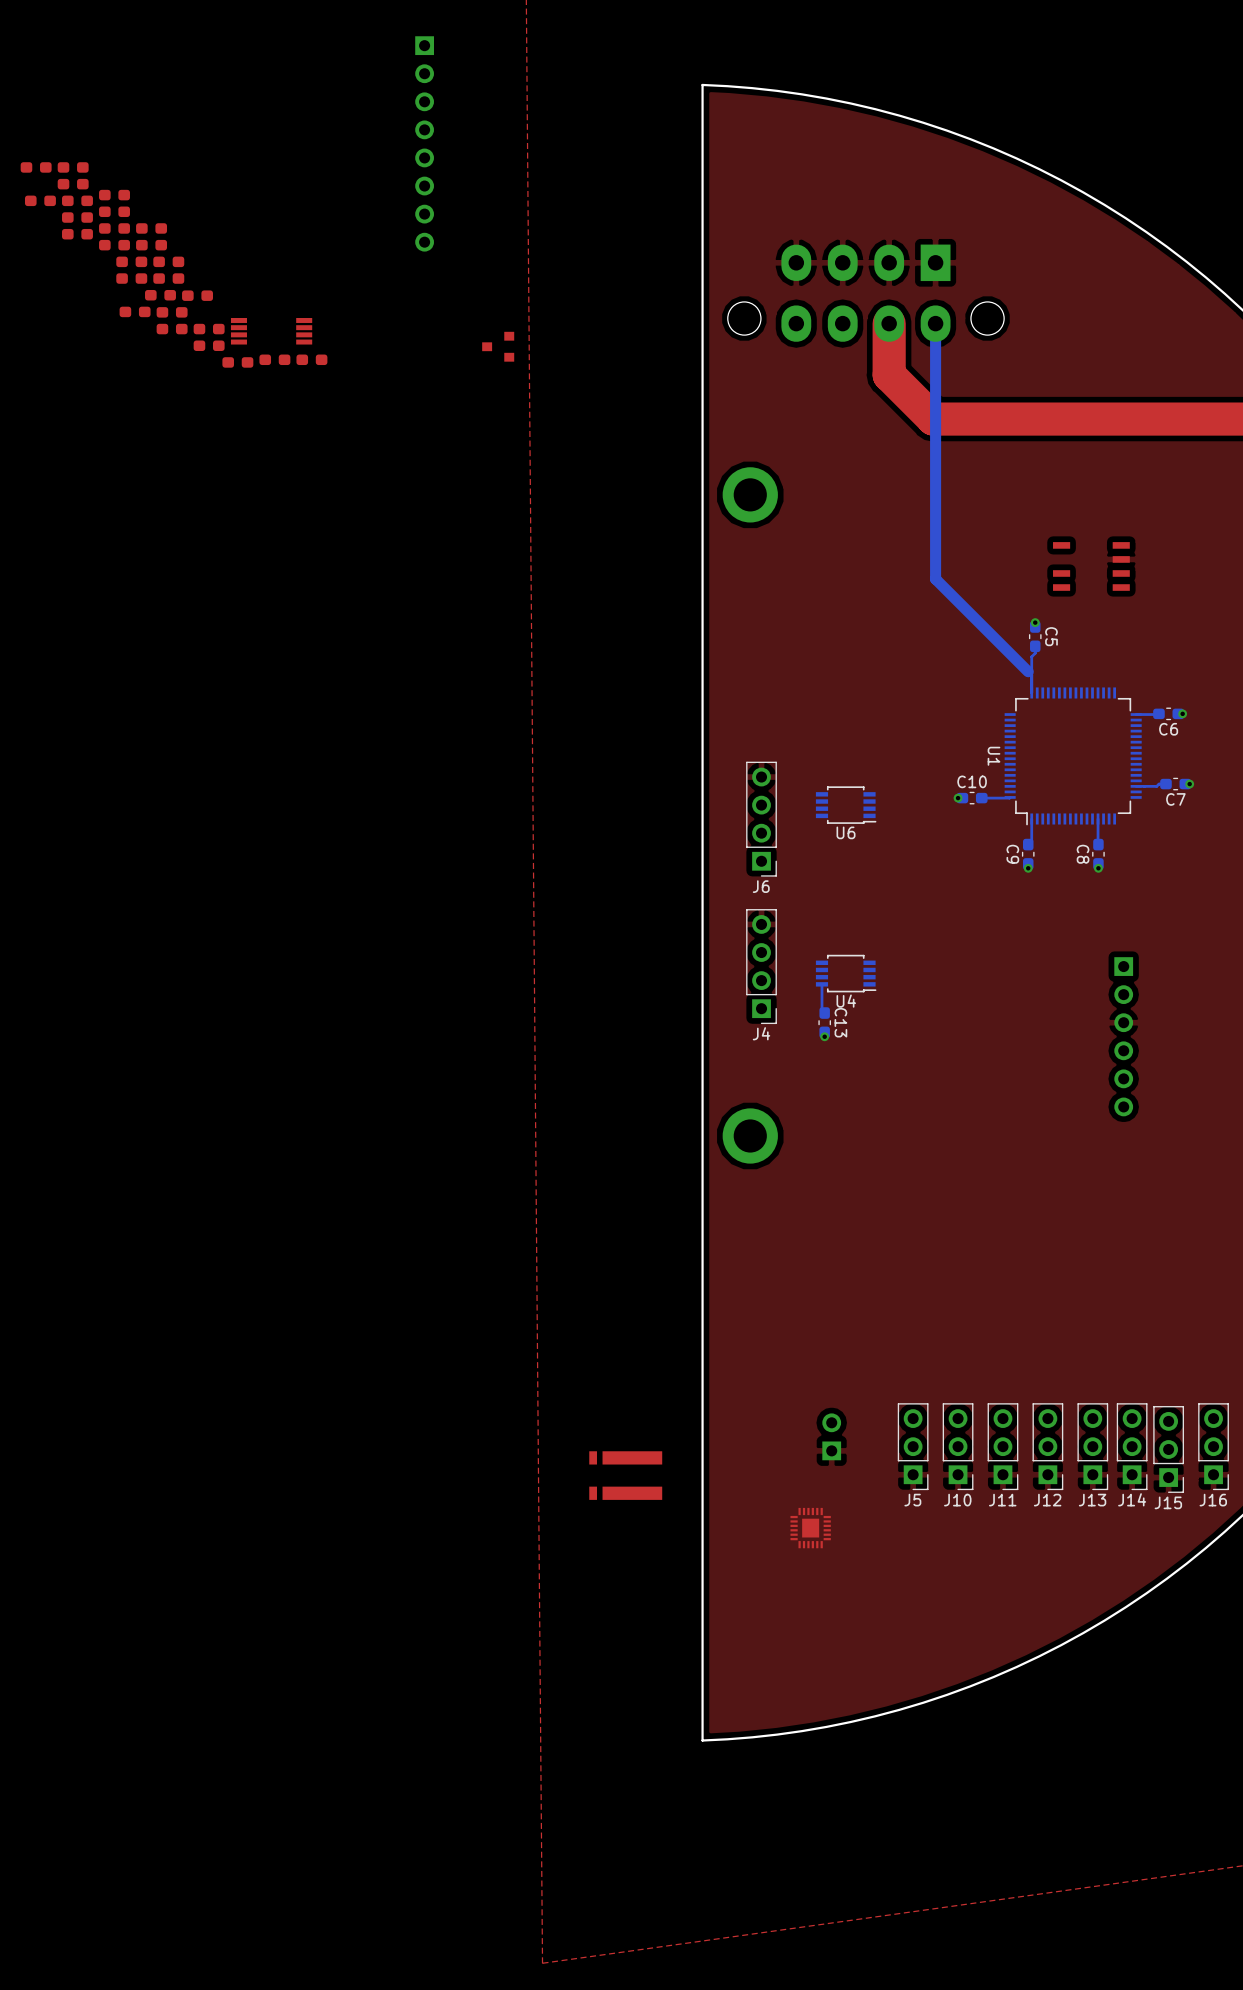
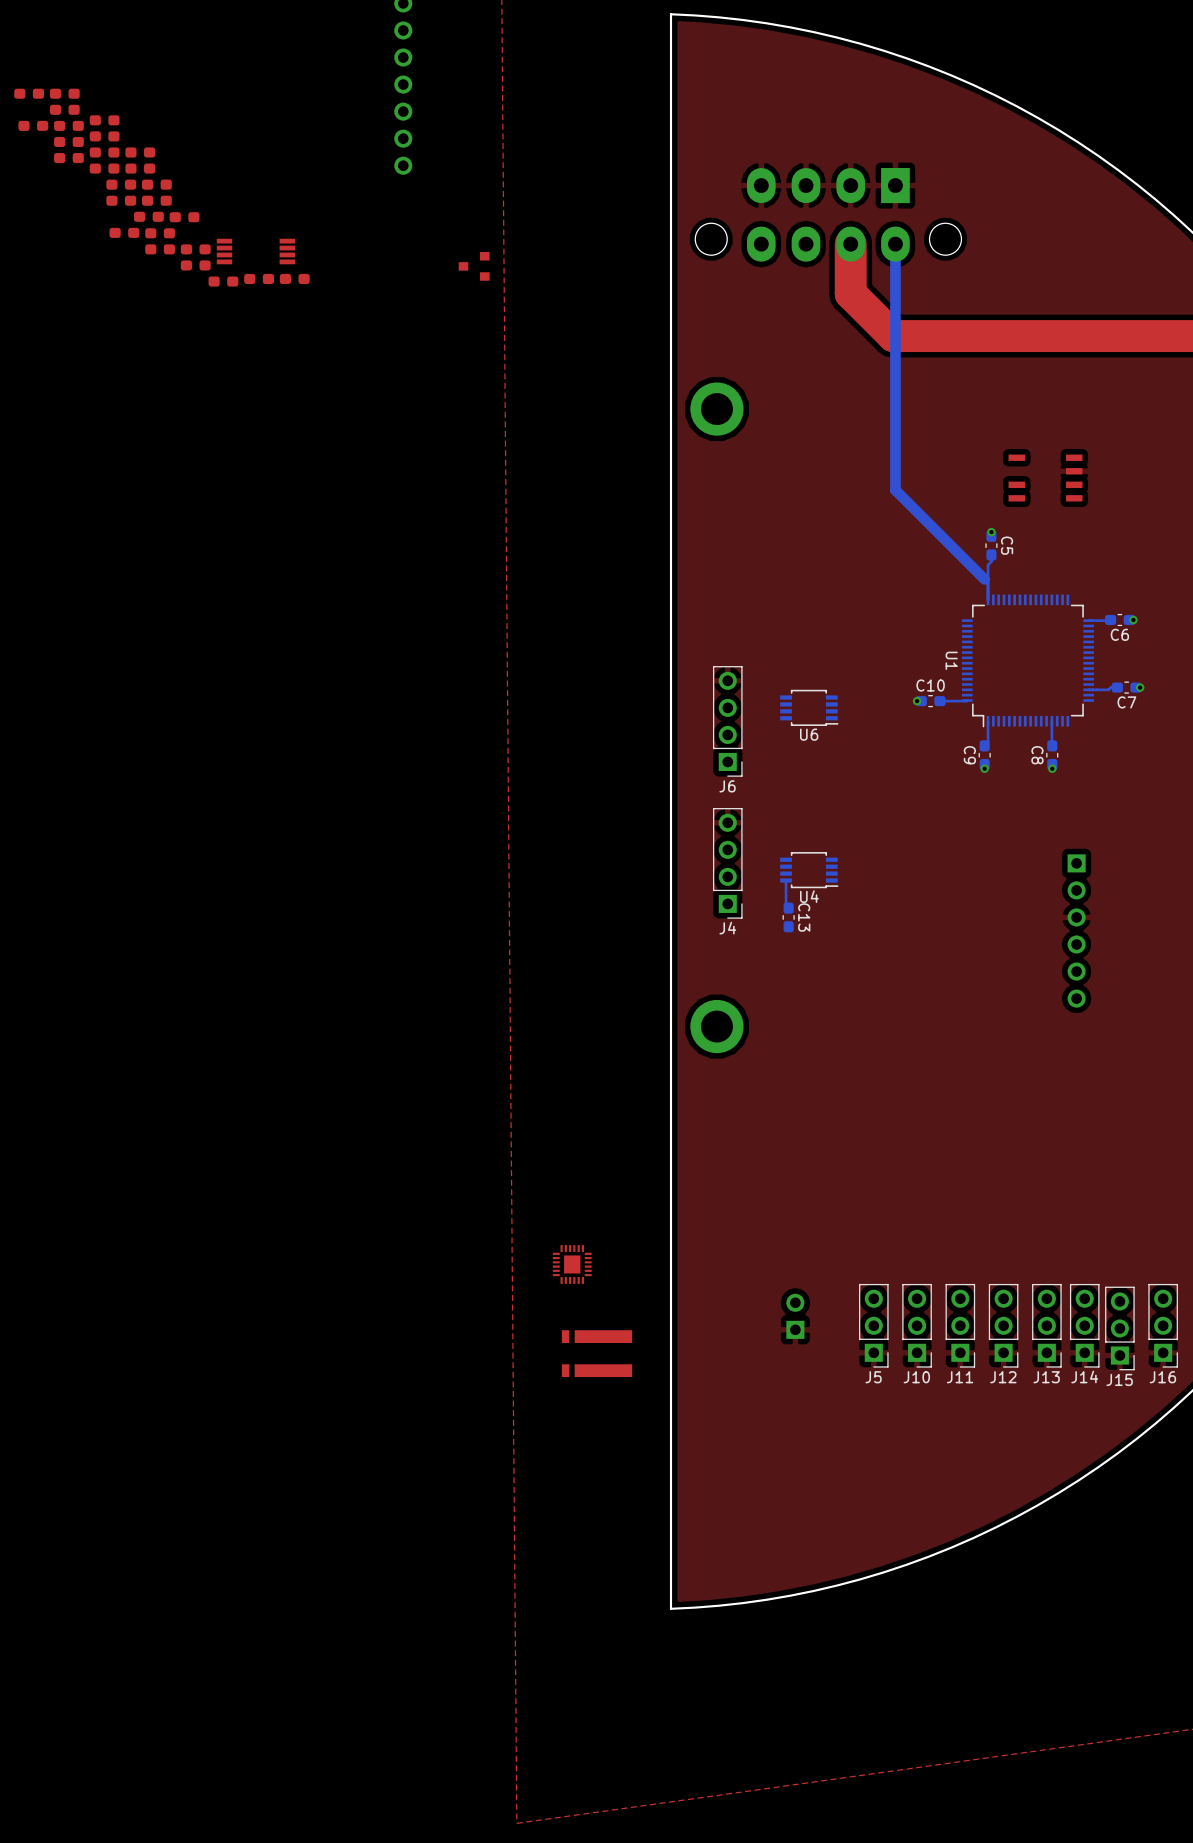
via: (824, 1036) -> none
part position: (810, 1528) -> (572, 1264)

